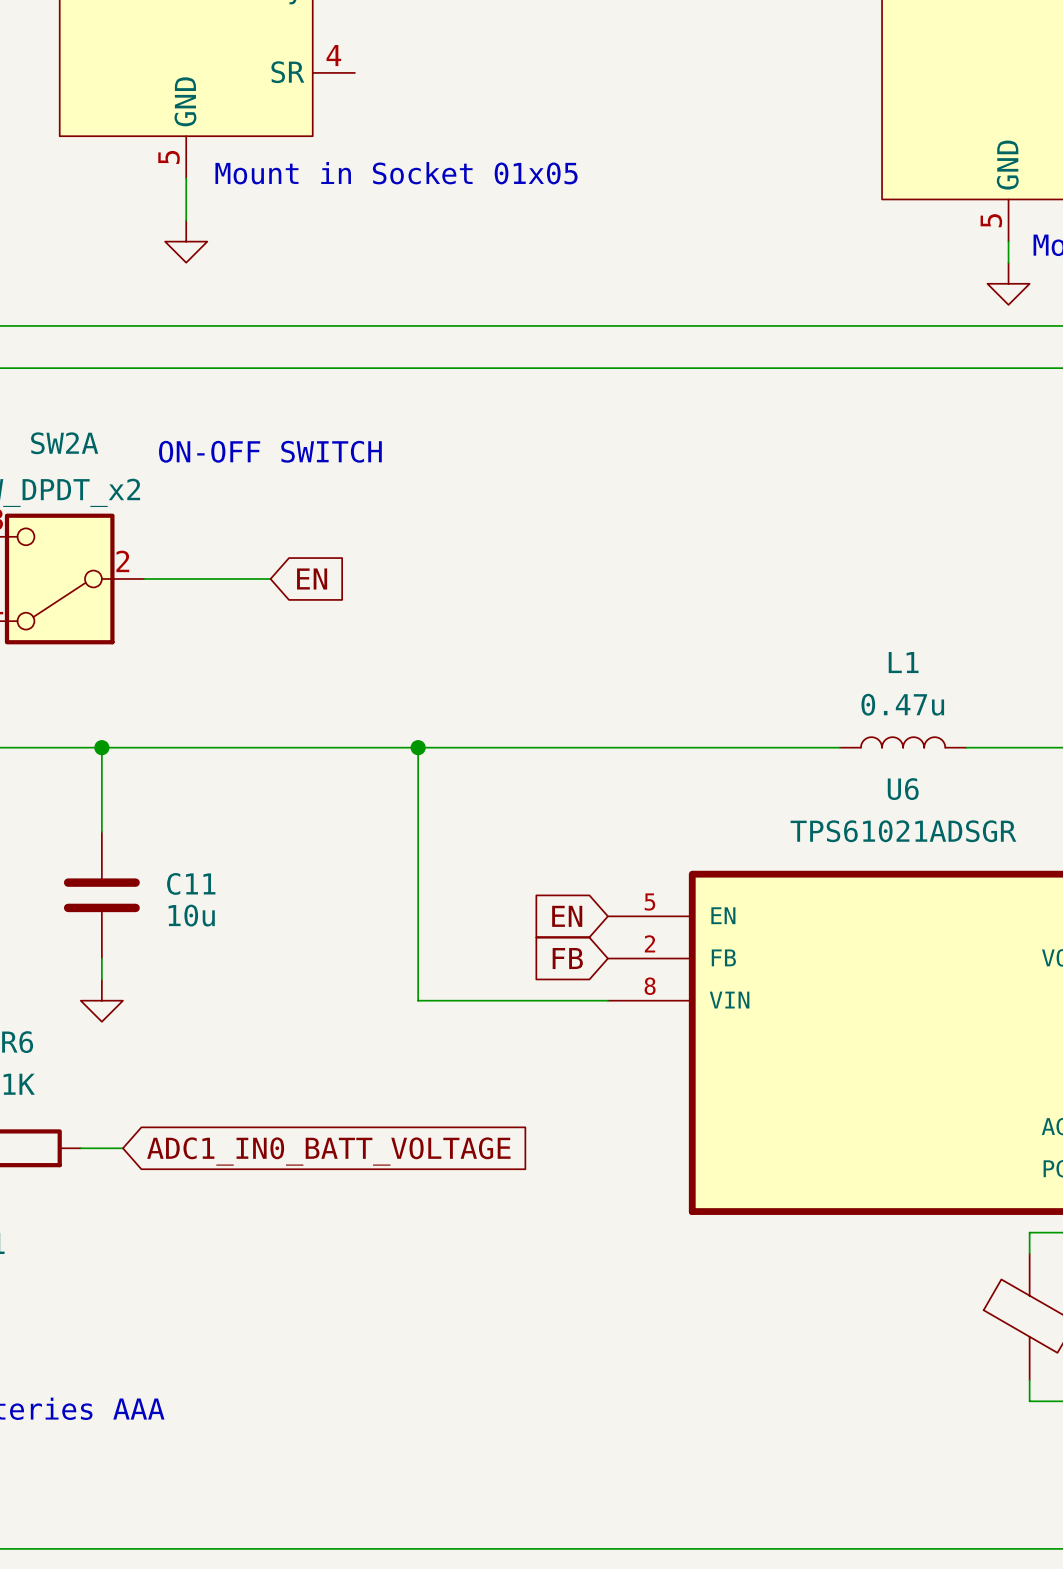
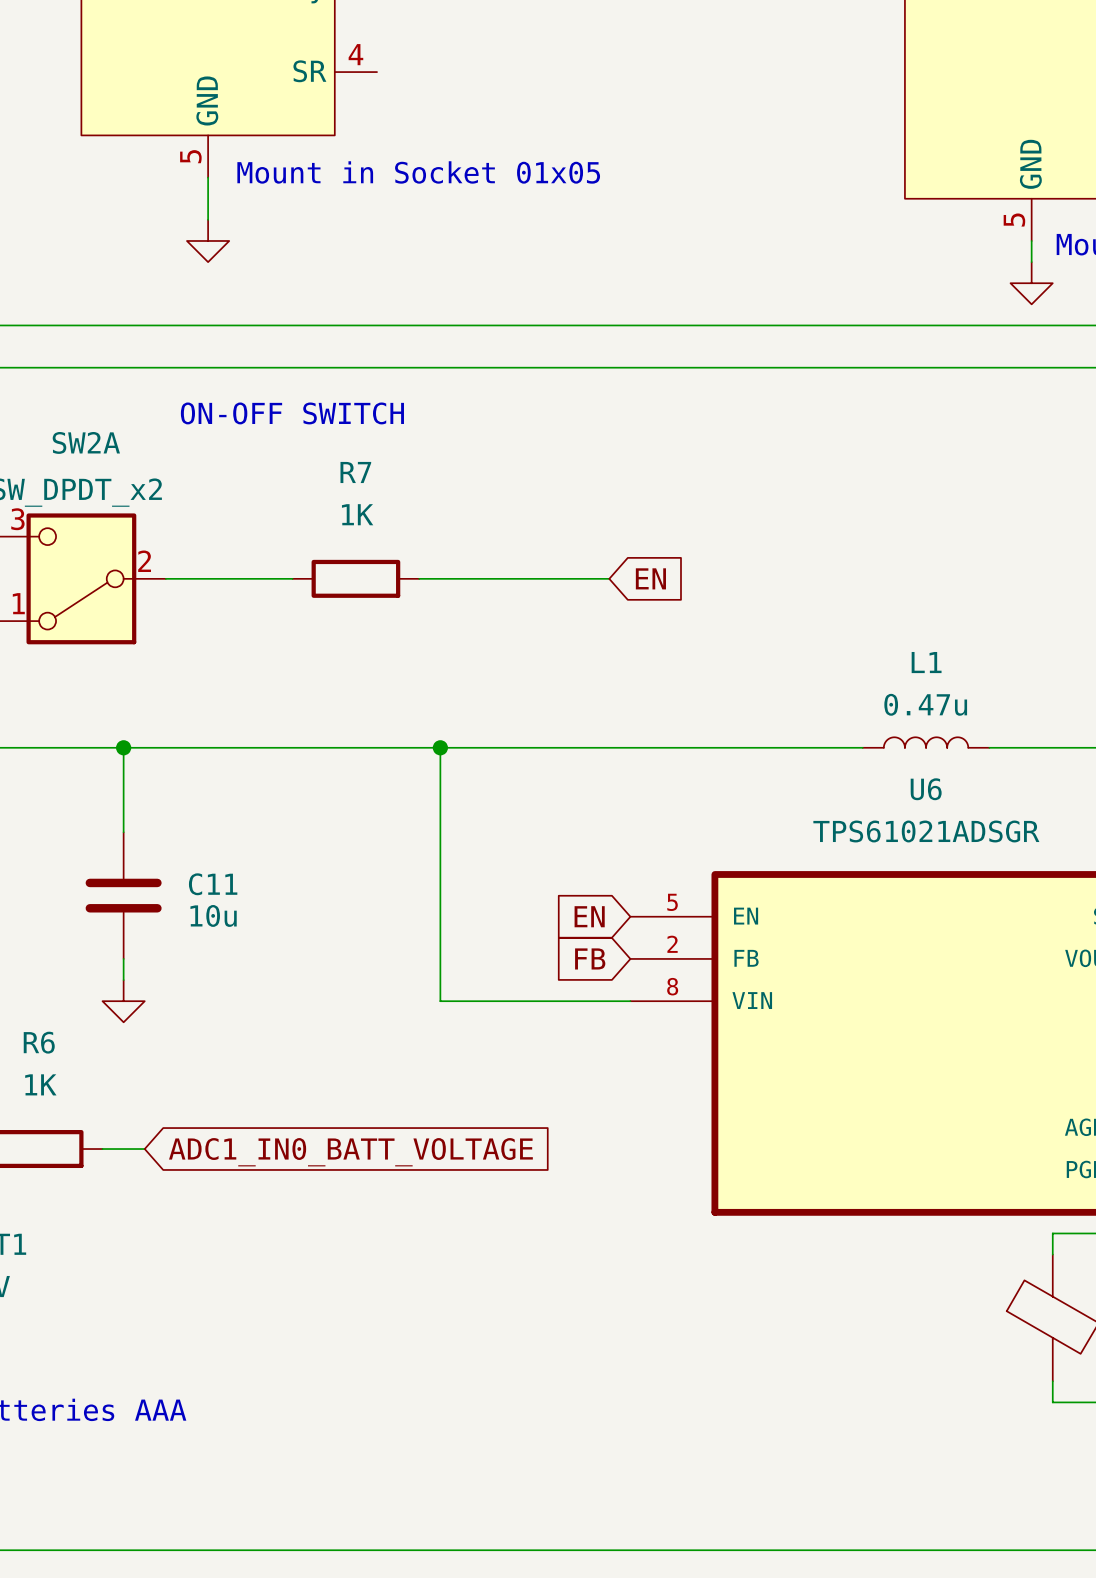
text position: ON-OFF SWITCH (270, 451) -> ON-OFF SWITCH (292, 413)
global label position: EN (312, 578) -> EN (650, 578)
R7: none -> 1K (355, 578)
wire: none -> (419, 578) (609, 578)

